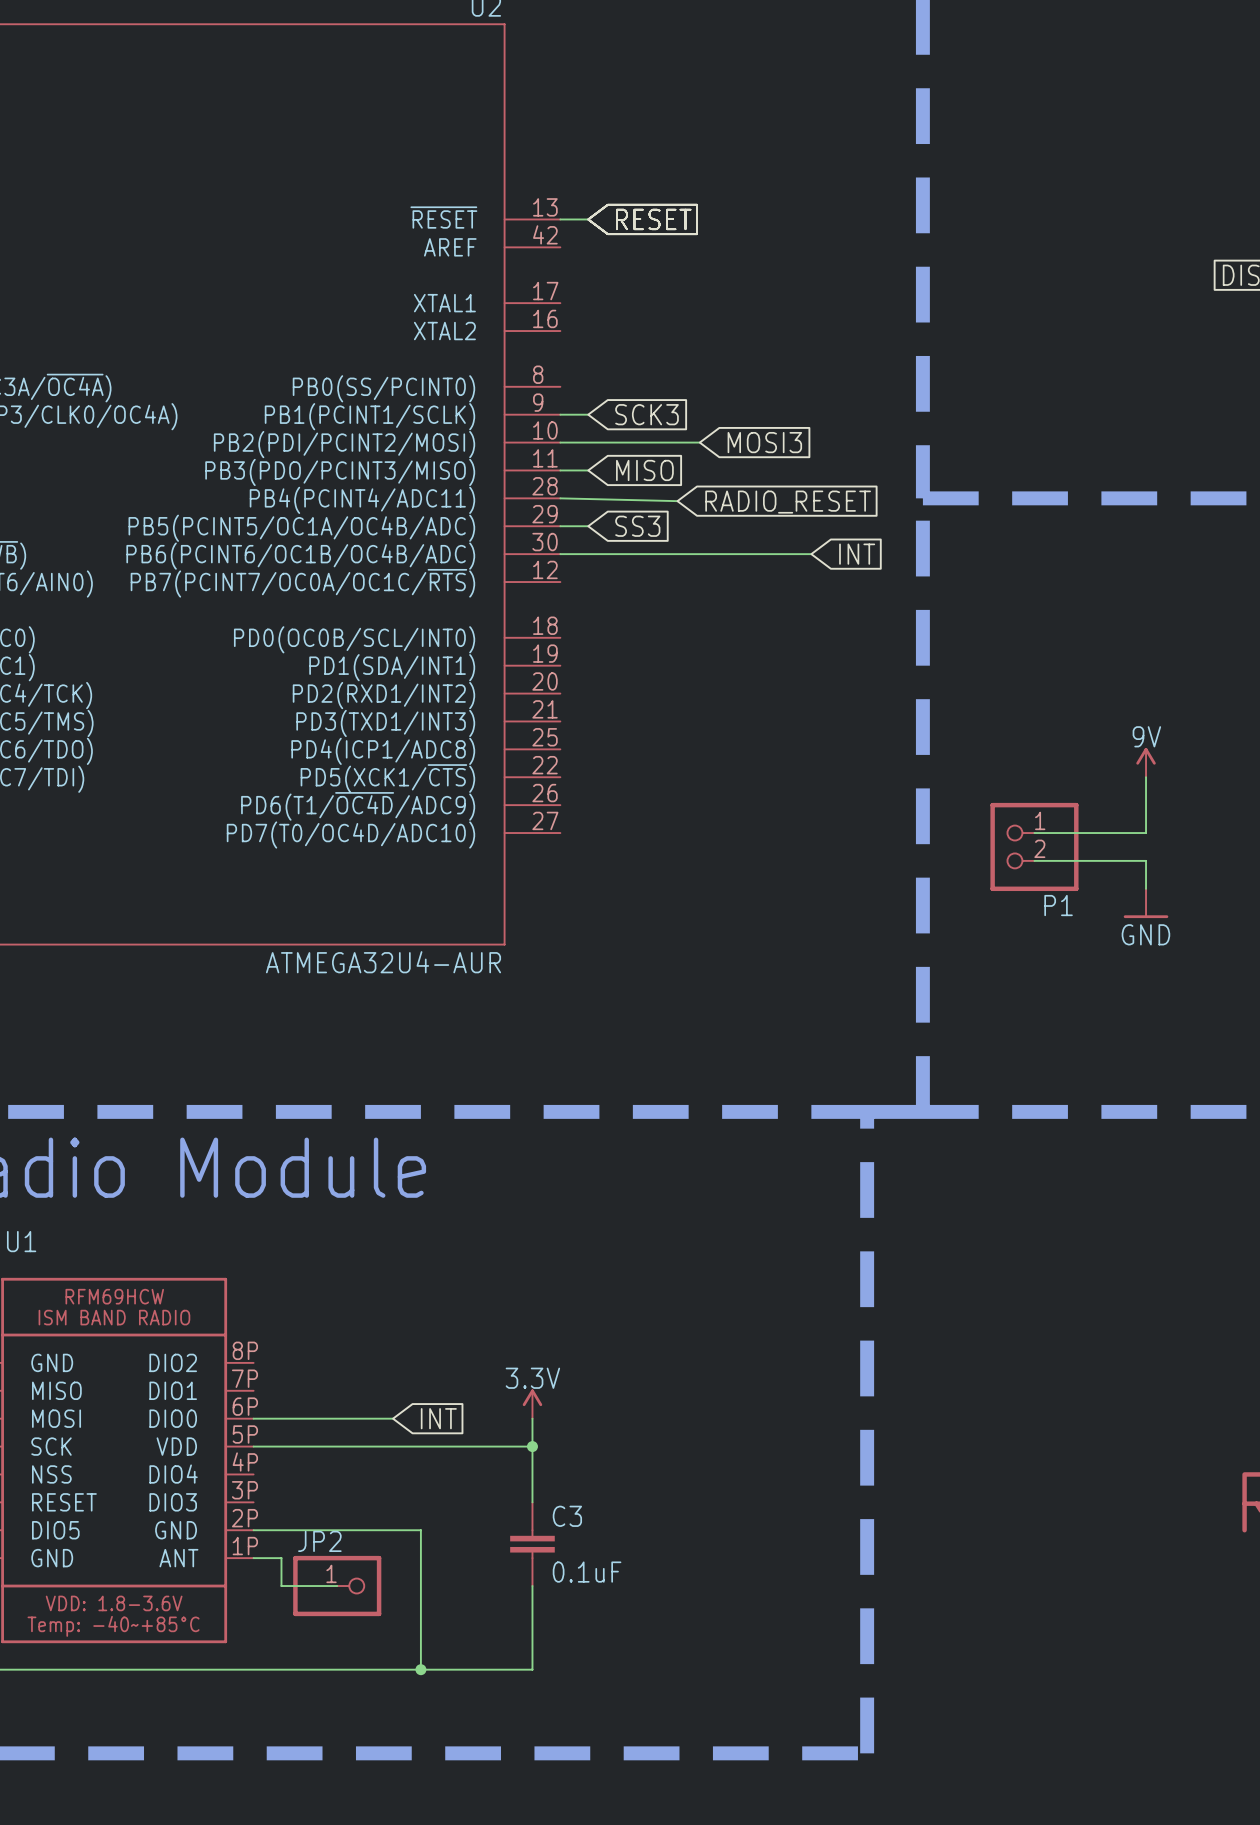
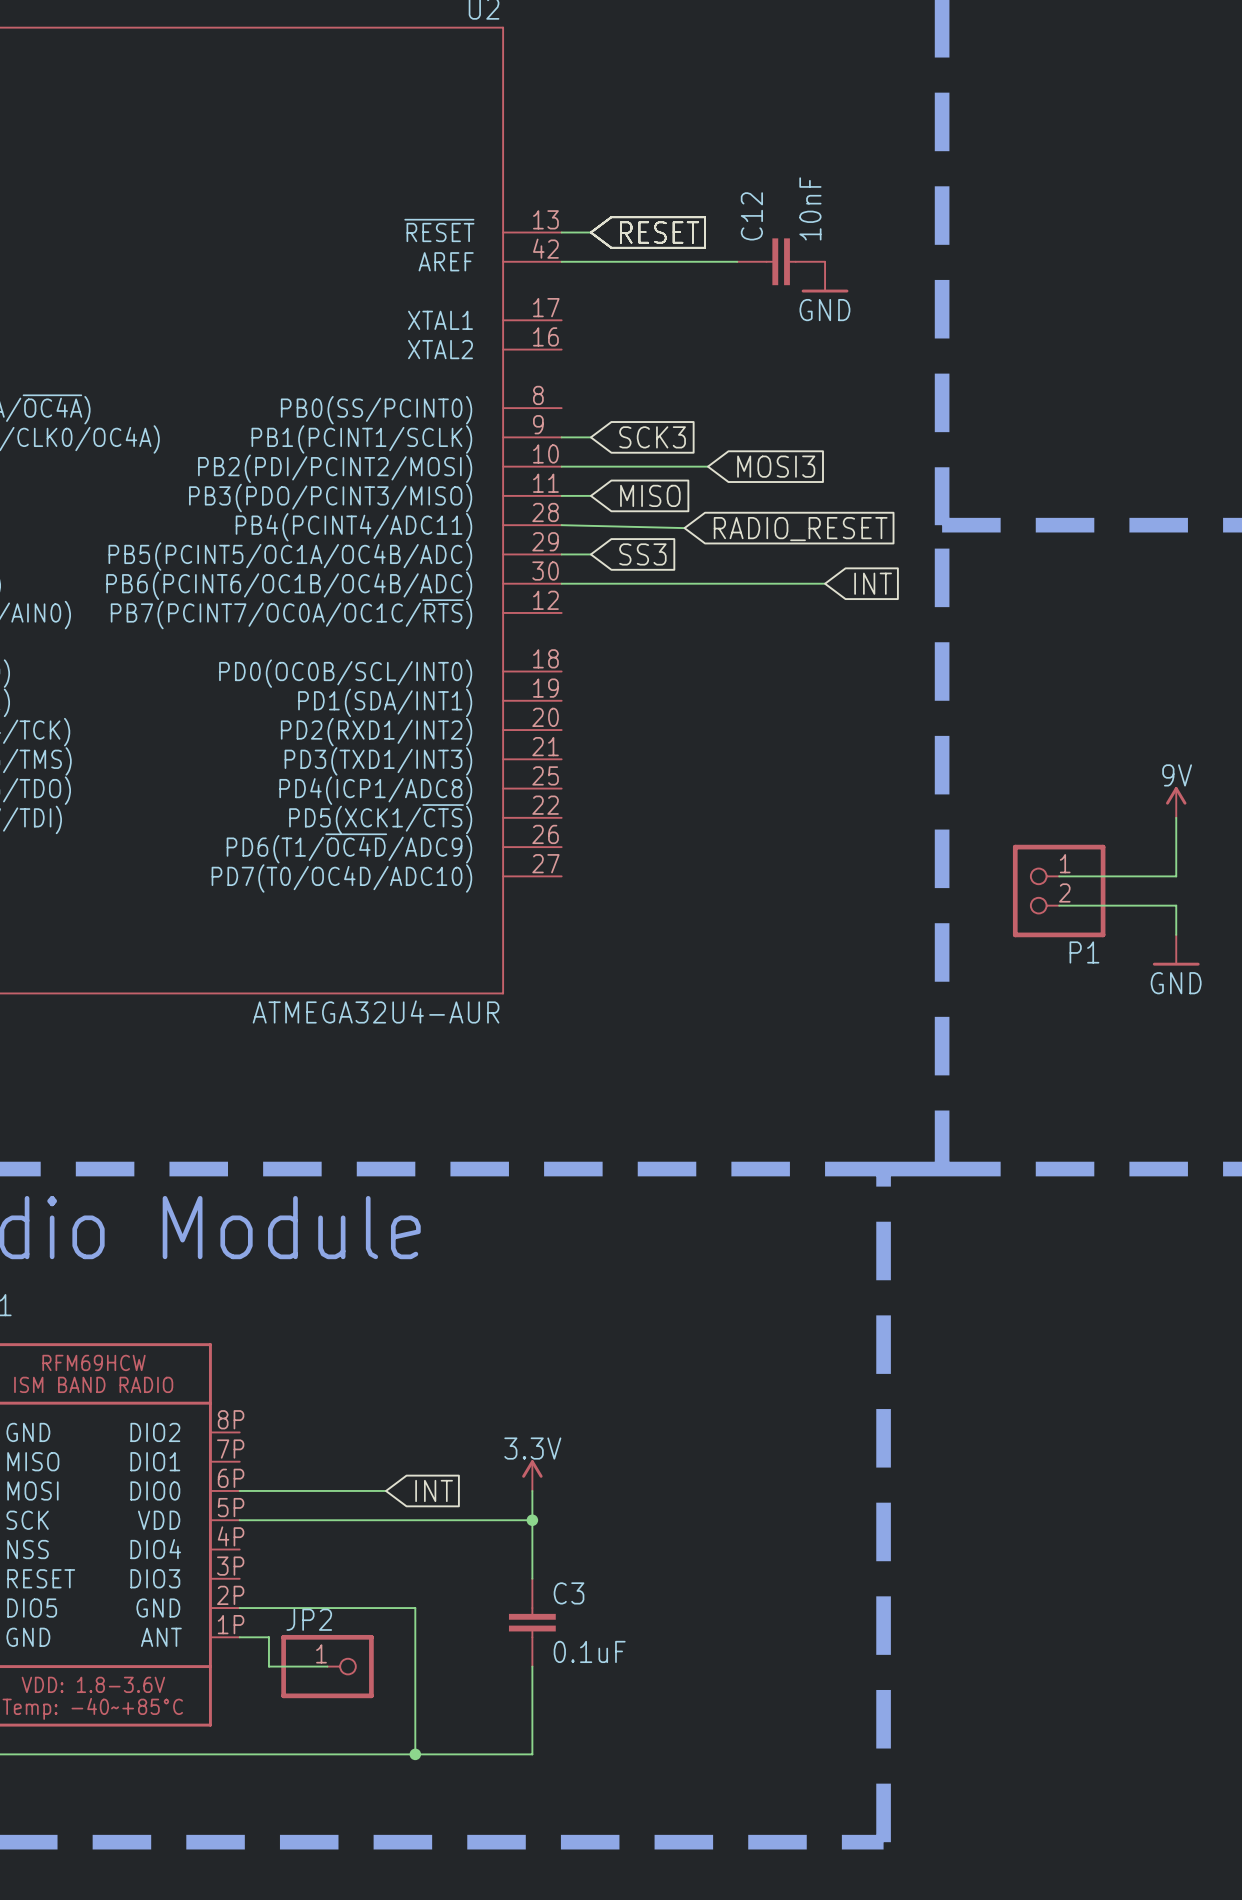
wire: none -> (561, 261) (737, 261)
C12: none -> 10nF (781, 261)
power symbol: none -> GND (825, 277)

